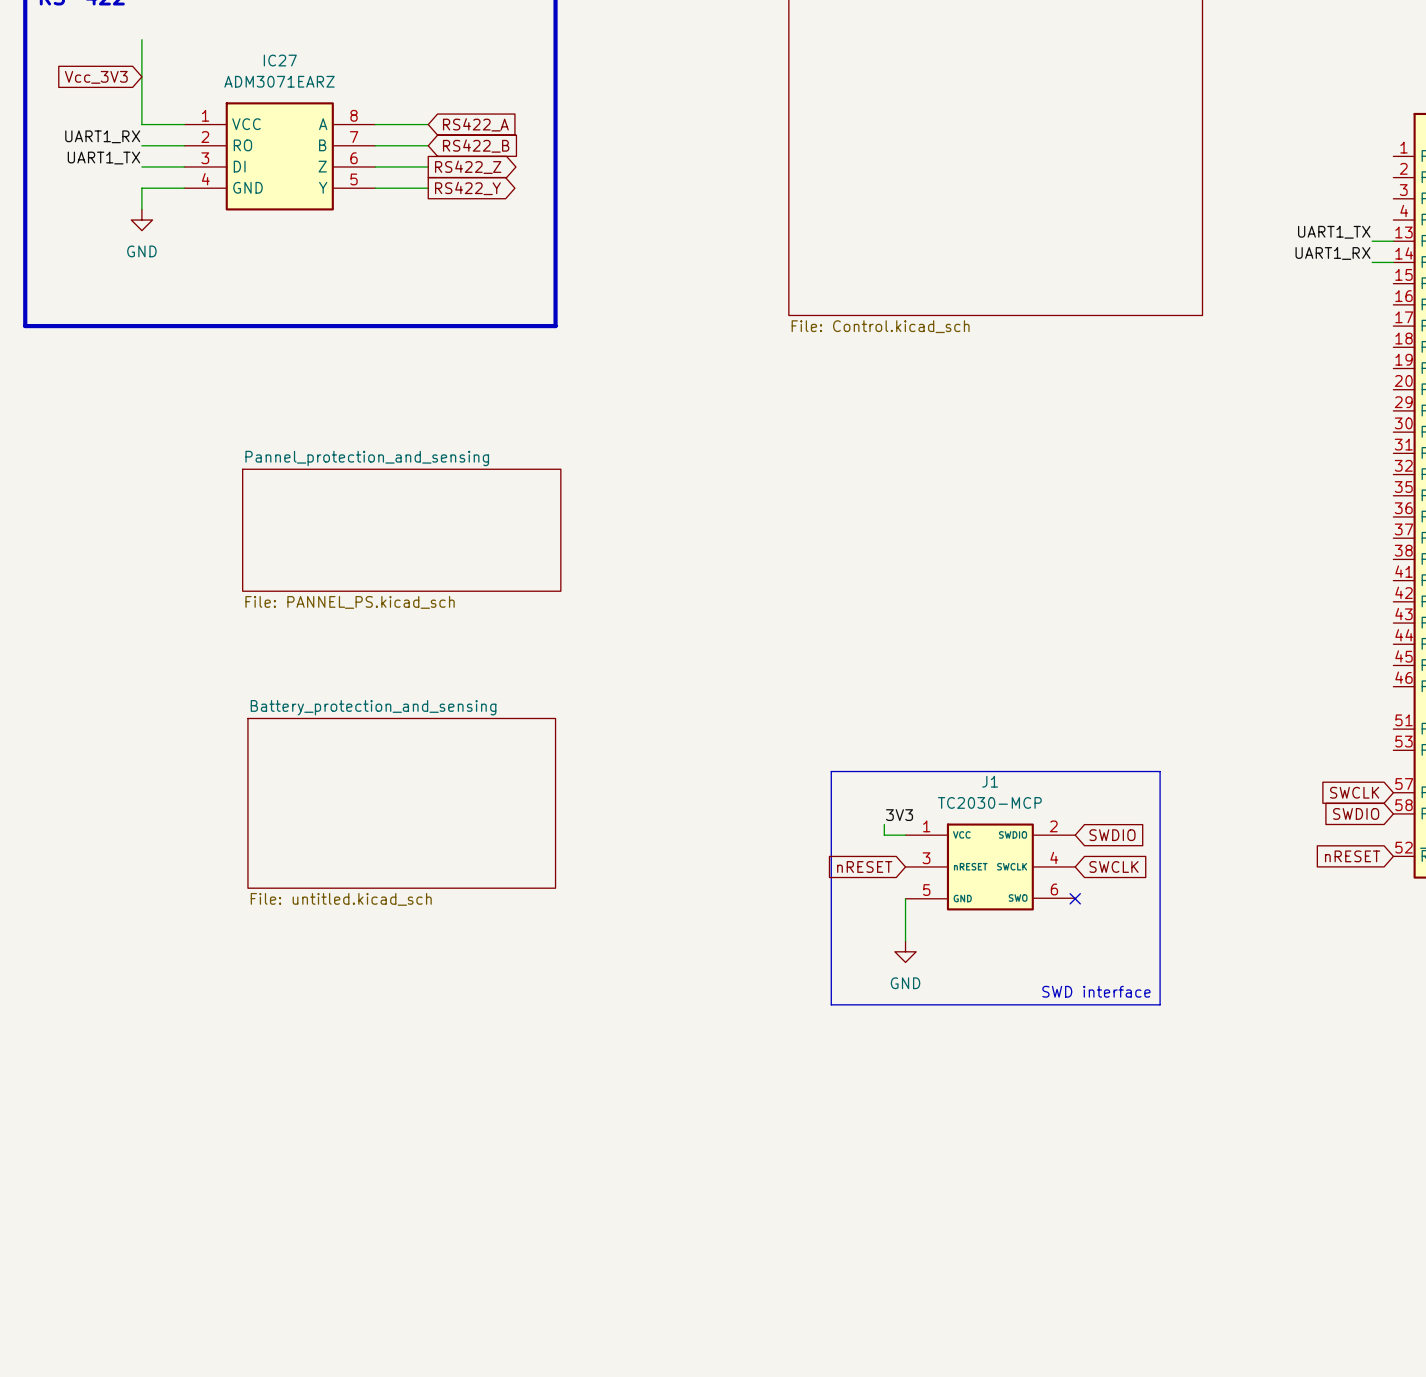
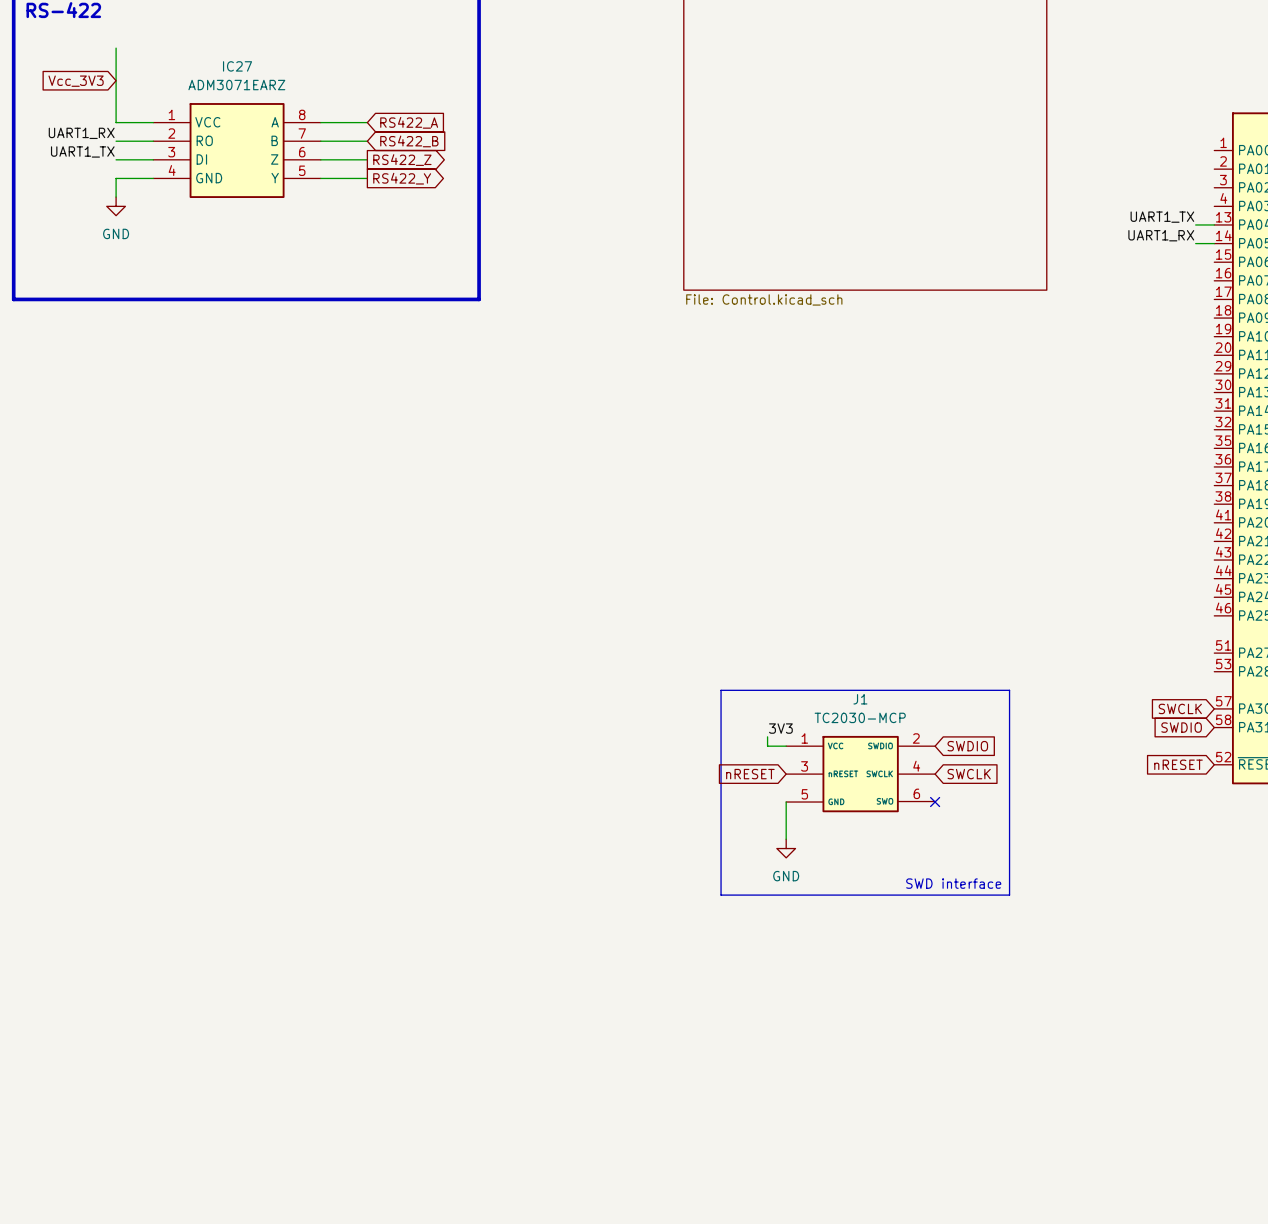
sheet Pannel_protection_and_sensing: File: PANNEL_PS.kicad_sch (401, 530) -> none
sheet Battery_protection_and_sensing: File: untitled.kicad_sch (401, 803) -> none

